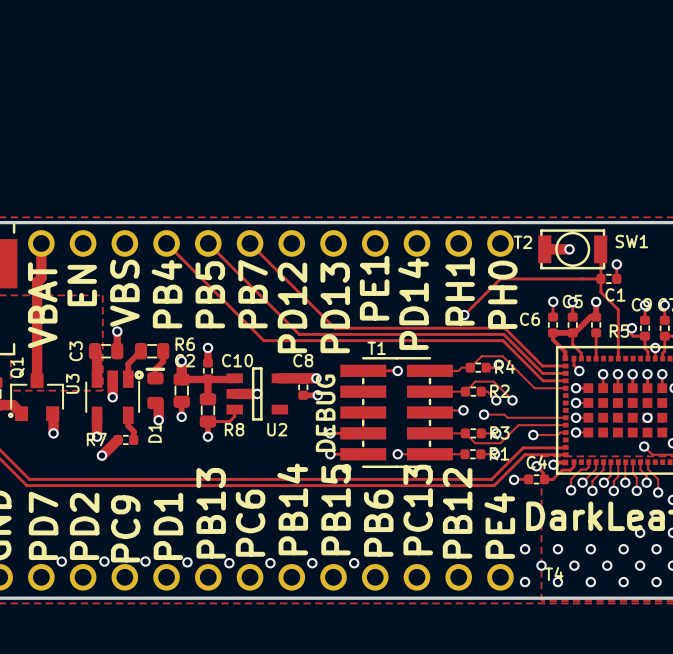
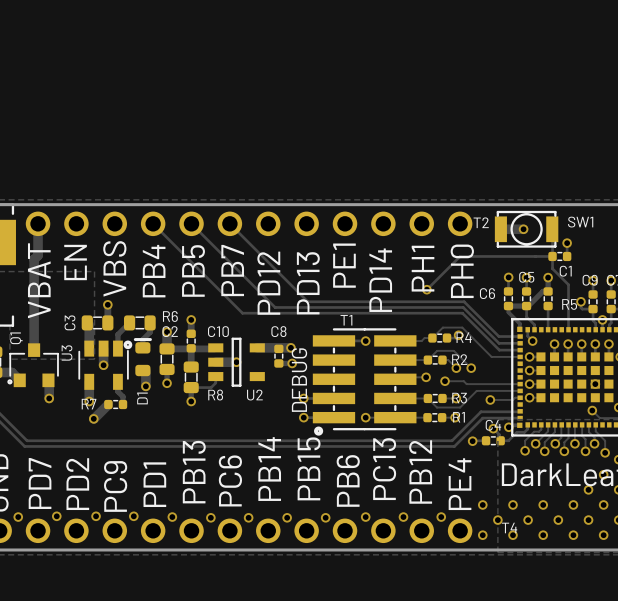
via: none -> (18, 517)
via: none -> (365, 517)
via: none -> (403, 517)
via: none -> (441, 517)

